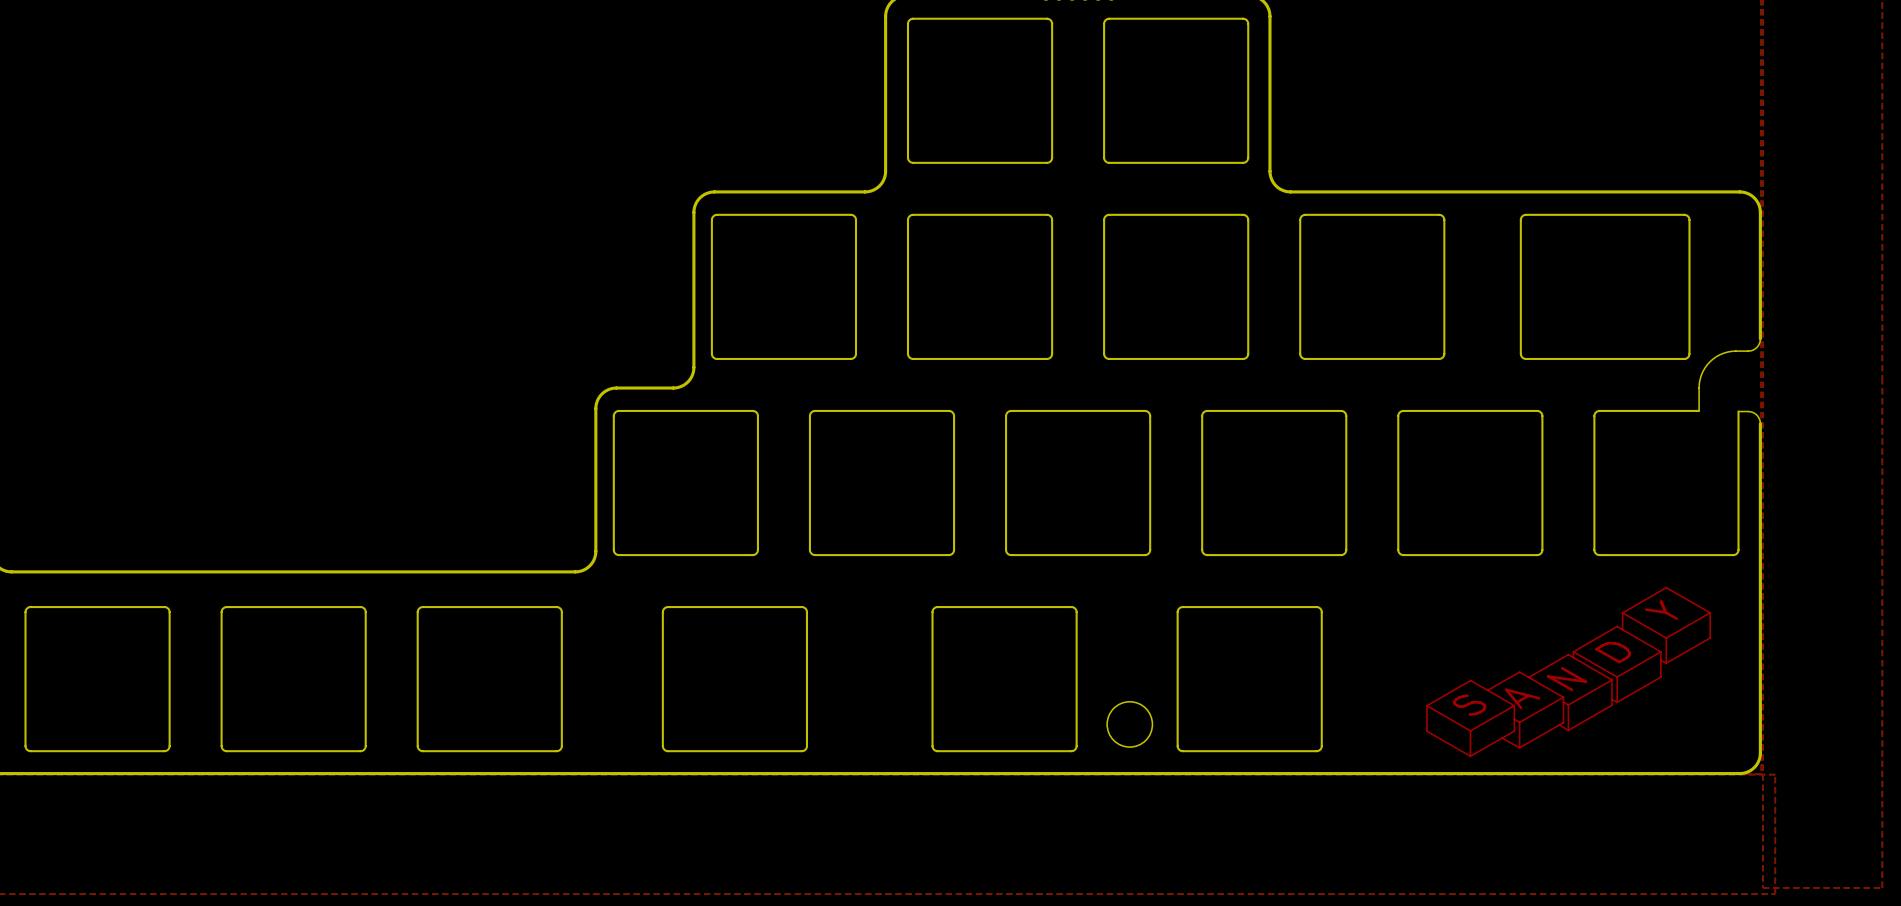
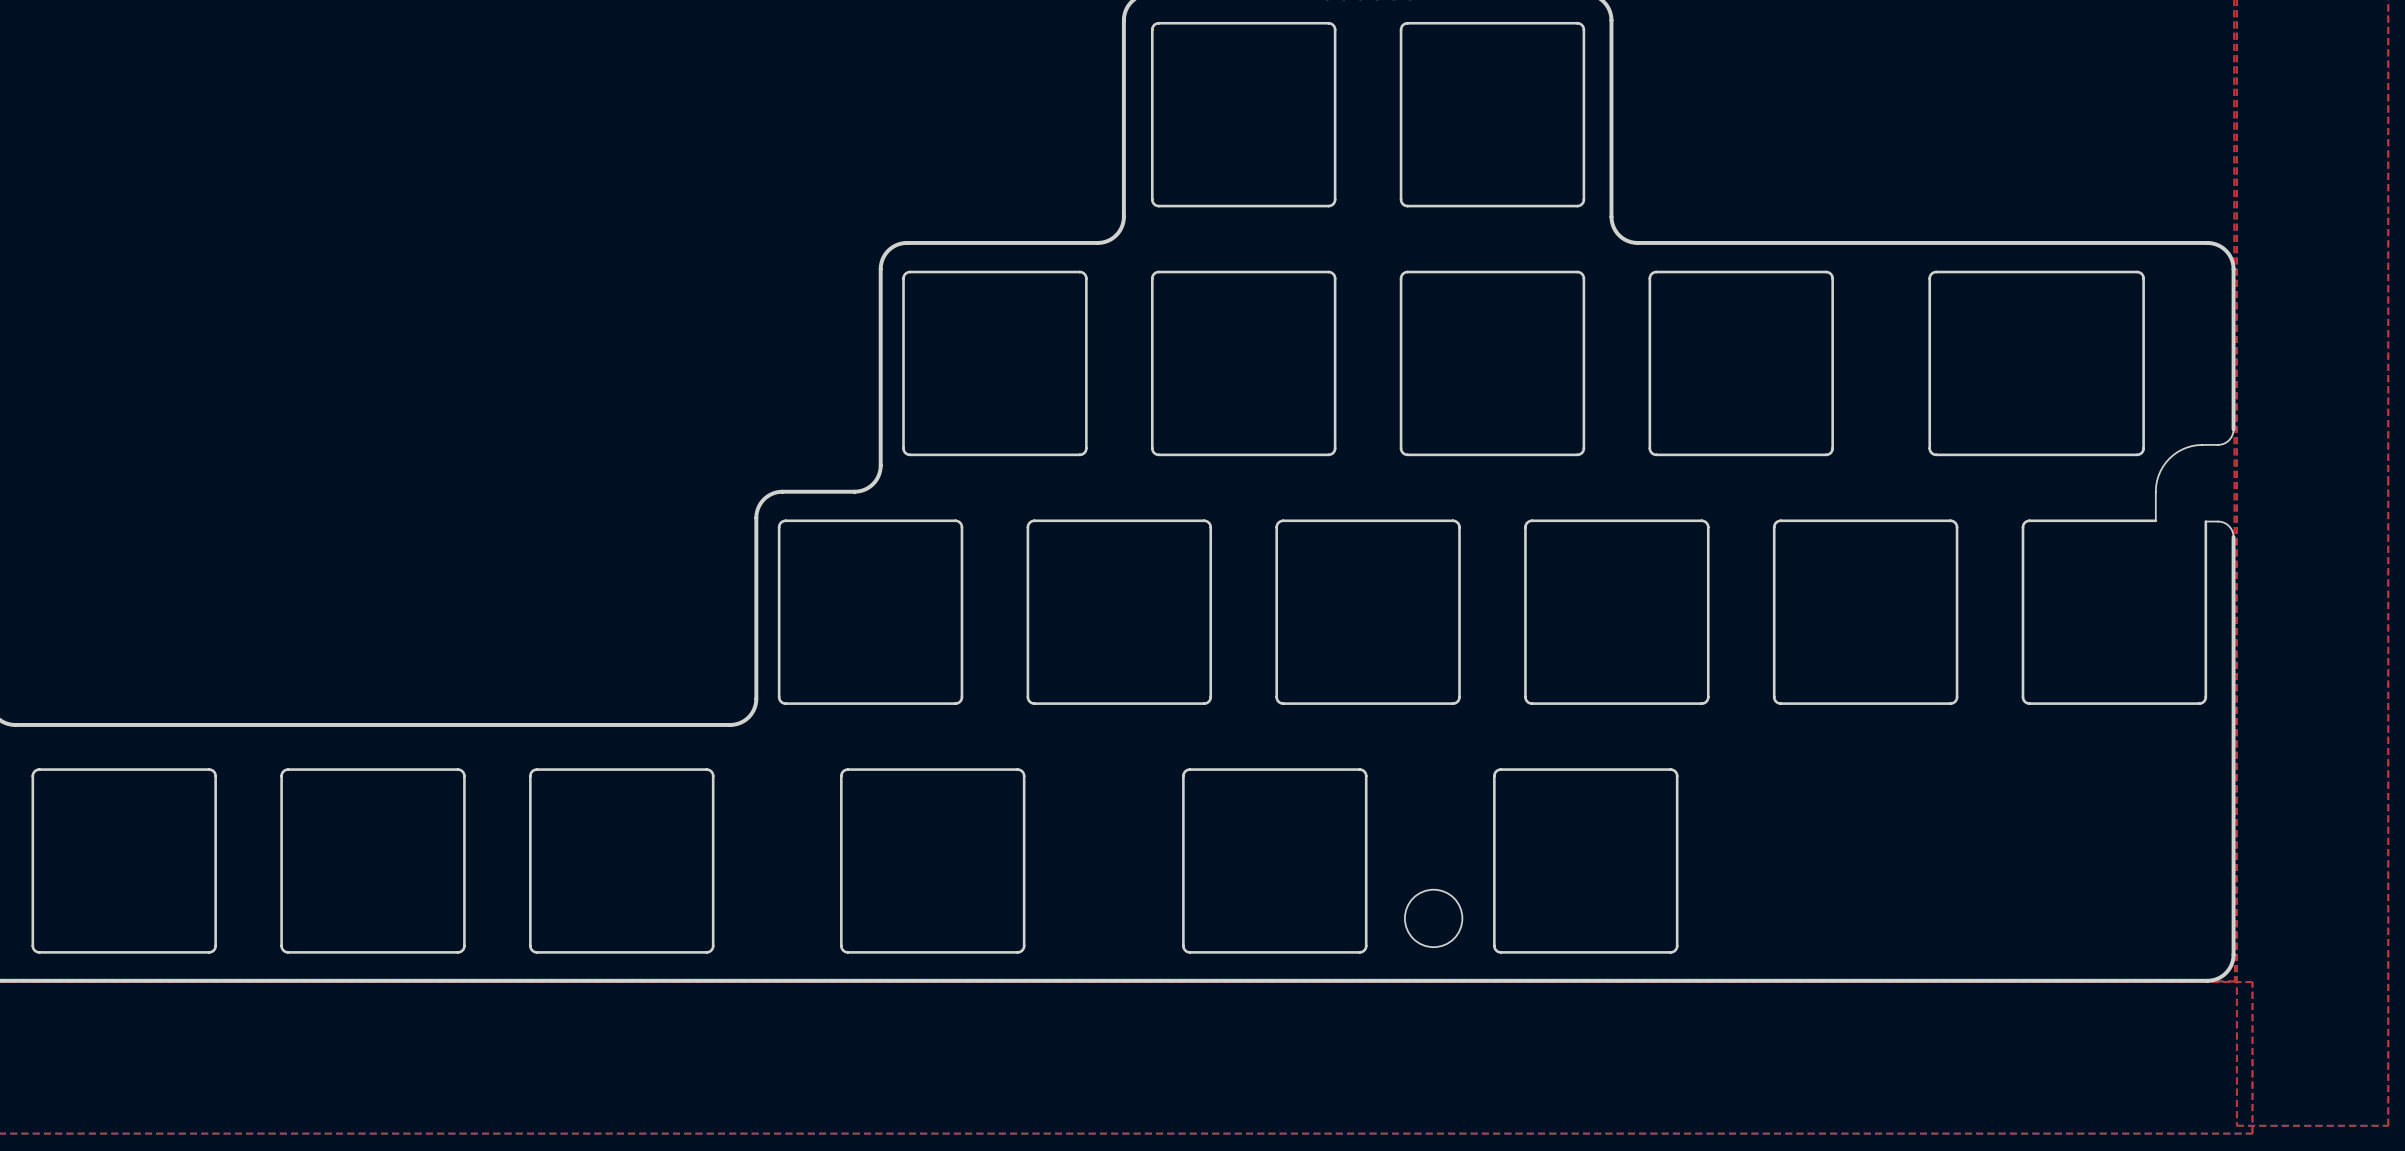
top track: (1666, 587) (1622, 612) -> none
top track: (1666, 587) (1710, 612) (1710, 638) (1666, 663) -> none
top track: (1661, 601) (1665, 612) -> none
top track: (1646, 609) (1665, 612) -> none
top track: (1622, 612) (1622, 629) -> none
top track: (1622, 612) (1666, 638) -> none
top track: (1665, 612) (1676, 618) -> none
top track: (1709, 612) (1666, 638) (1666, 663) (1660, 660) -> none
top track: (1617, 626) (1573, 651) -> none
top track: (1617, 626) (1660, 651) -> none
top track: (1627, 649) (1629, 655) (1619, 662) (1596, 649) (1609, 643) (1619, 644) (1627, 649) -> none
top track: (1573, 651) (1573, 657) -> none
top track: (1573, 651) (1617, 677) -> none
top track: (1660, 651) (1617, 677) -> none
top track: (1660, 651) (1660, 677) (1617, 702) -> none
top track: (1562, 668) (1585, 681) (1548, 676) (1571, 689) -> none
top track: (1528, 677) (1568, 654) (1611, 680) -> none
top track: (1617, 677) (1617, 702) -> none
top track: (1611, 680) (1611, 705) -> none
top track: (1611, 680) (1568, 704) -> none
top track: (1487, 690) (1519, 672) (1563, 697) (1519, 722) (1519, 747) -> none
top track: (1467, 695) (1459, 697) (1454, 703) (1463, 706) (1475, 702) (1480, 702) (1485, 706) (1479, 712) (1469, 714) -> none
top track: (1528, 695) (1516, 702) -> none
top track: (1563, 697) (1563, 722) -> none
top track: (1538, 698) (1506, 689) (1516, 702) -> none
top track: (1611, 699) (1617, 702) -> none
top track: (1516, 702) (1521, 707) -> none
top track: (1563, 702) (1568, 704) -> none
top track: (1568, 704) (1568, 730) -> none
top track: (1426, 705) (1470, 730) -> none
top track: (1426, 705) (1426, 731) (1470, 756) -> none
top track: (1514, 705) (1470, 680) (1426, 705) -> none
top track: (1514, 705) (1514, 731) (1502, 738) -> none
top track: (1514, 705) (1470, 730) -> none
top track: (1611, 705) (1568, 730) -> none
top track: (1514, 719) (1519, 722) -> none
top track: (1563, 722) (1519, 747) -> none
top track: (1559, 725) (1568, 730) -> none
top track: (1470, 730) (1470, 756) -> none
top track: (1502, 738) (1519, 747) -> none
top track: (1502, 738) (1470, 756) -> none

